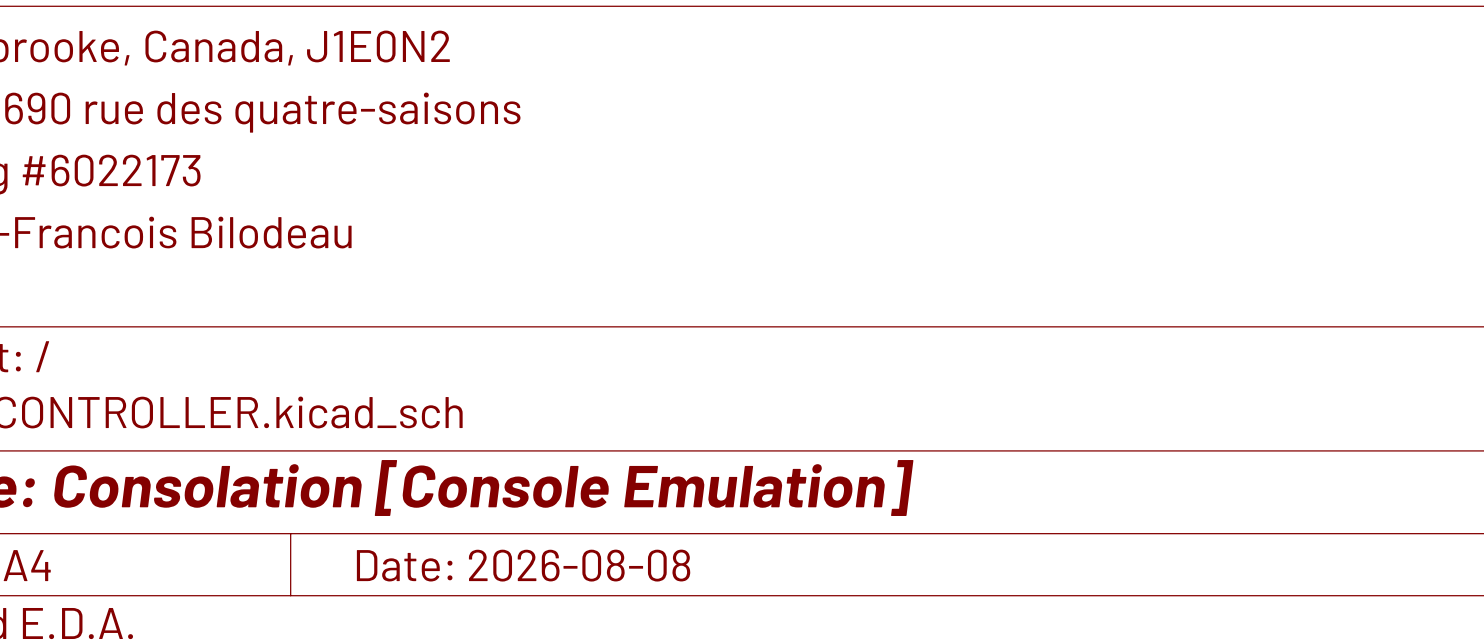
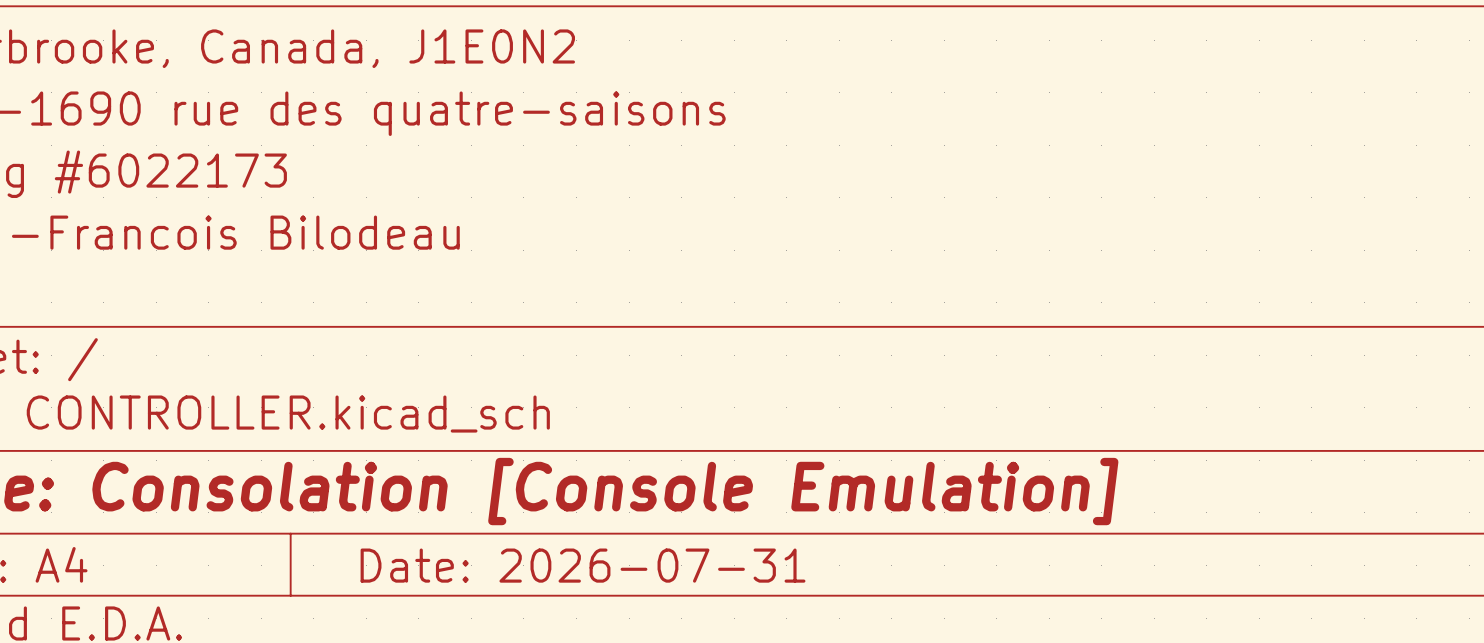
title block: Date: 2026-08-08 (523, 565) -> Date: 2026-07-31 (583, 565)

